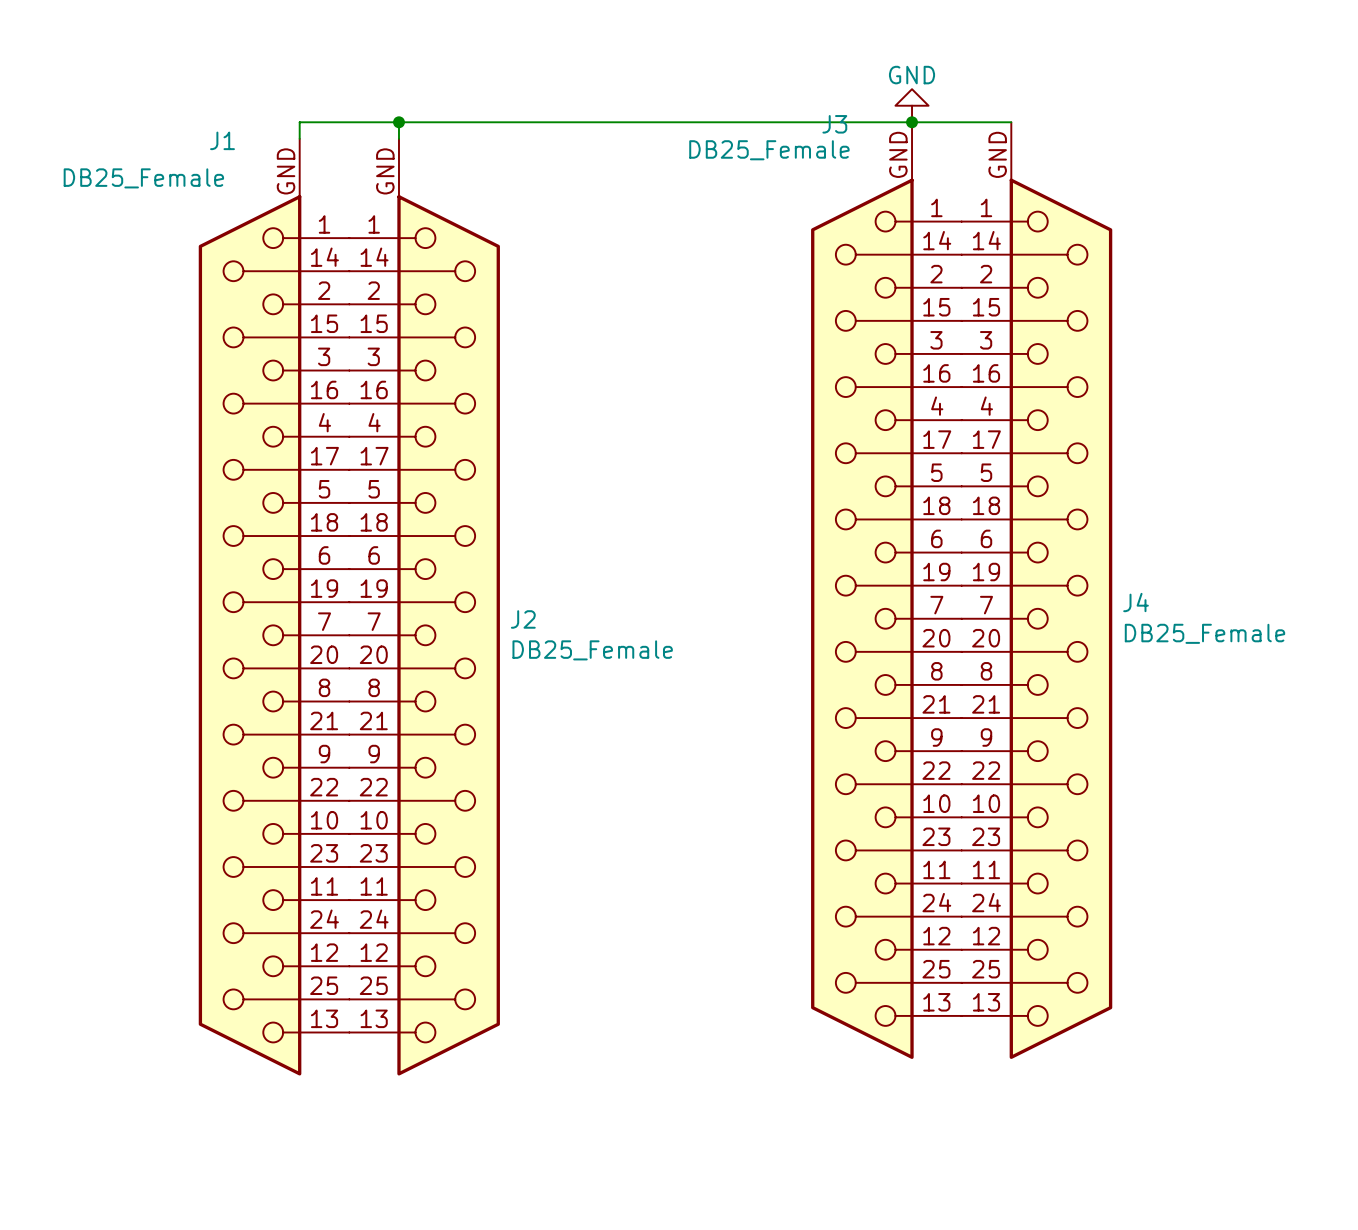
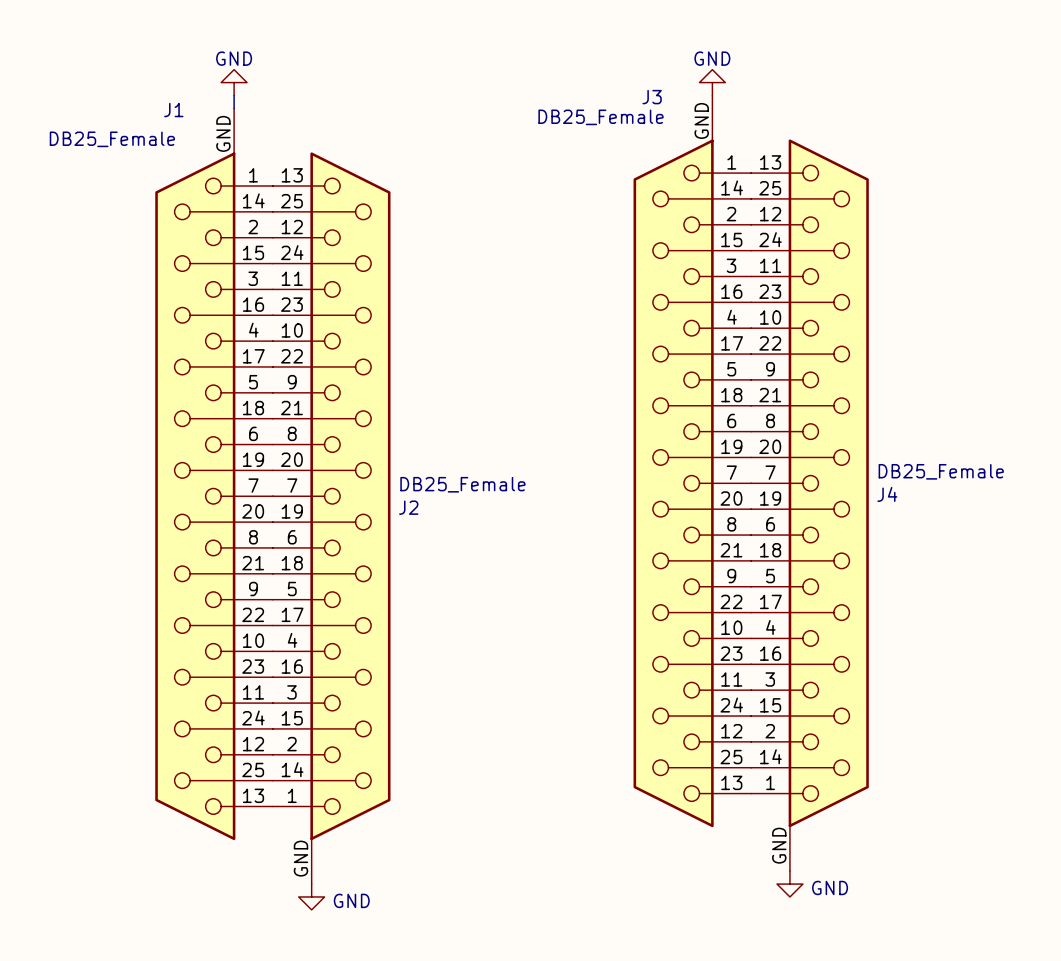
power symbol: none -> GND (234, 82)
wire: (299, 122) (1011, 122) -> none
wire: (398, 122) (398, 138) -> none
junction: (398, 122) -> none
junction: (912, 122) -> none
J4 flip: as is (1060, 618) -> up-down (828, 483)
J2 flip: as is (448, 635) -> up-down (350, 496)
power symbol: none -> GND (789, 884)
power symbol: none -> GND (311, 896)

